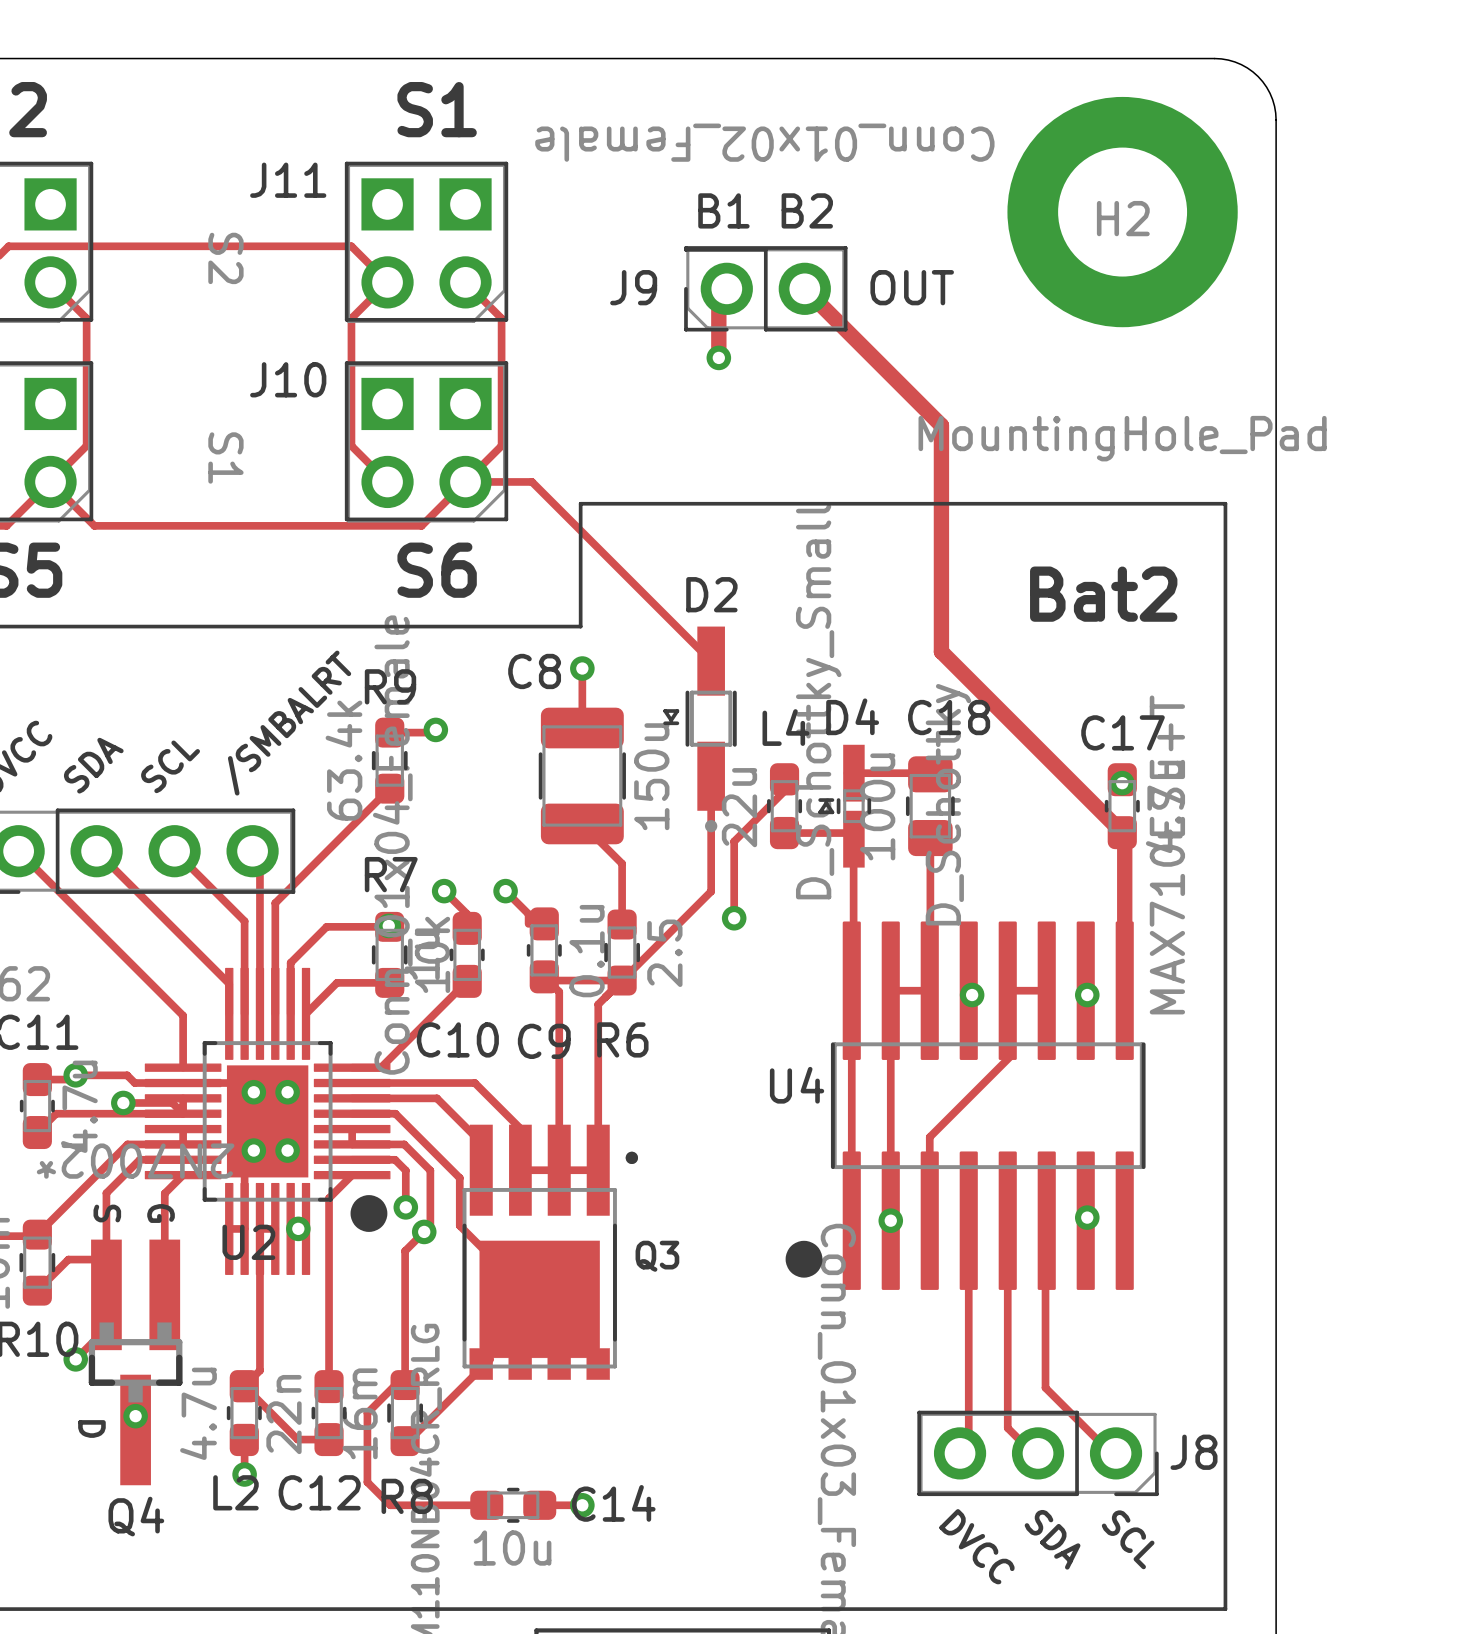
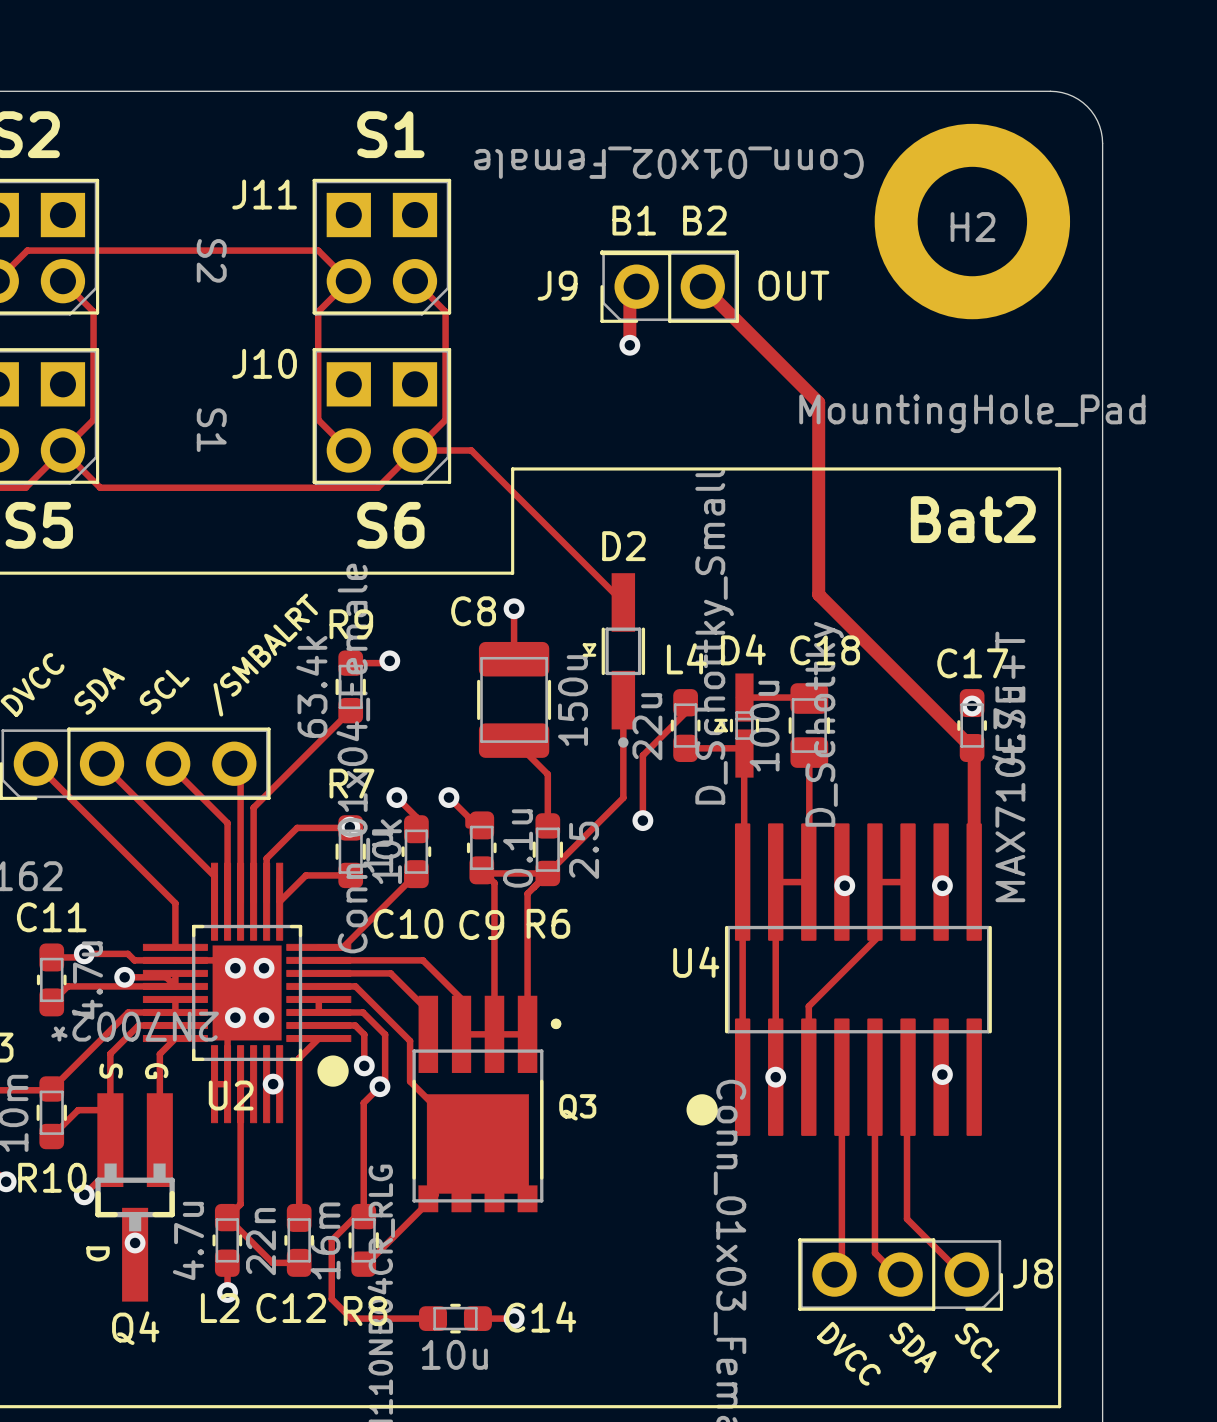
text position: Bat2 (1103, 594) -> Bat2 (973, 519)

